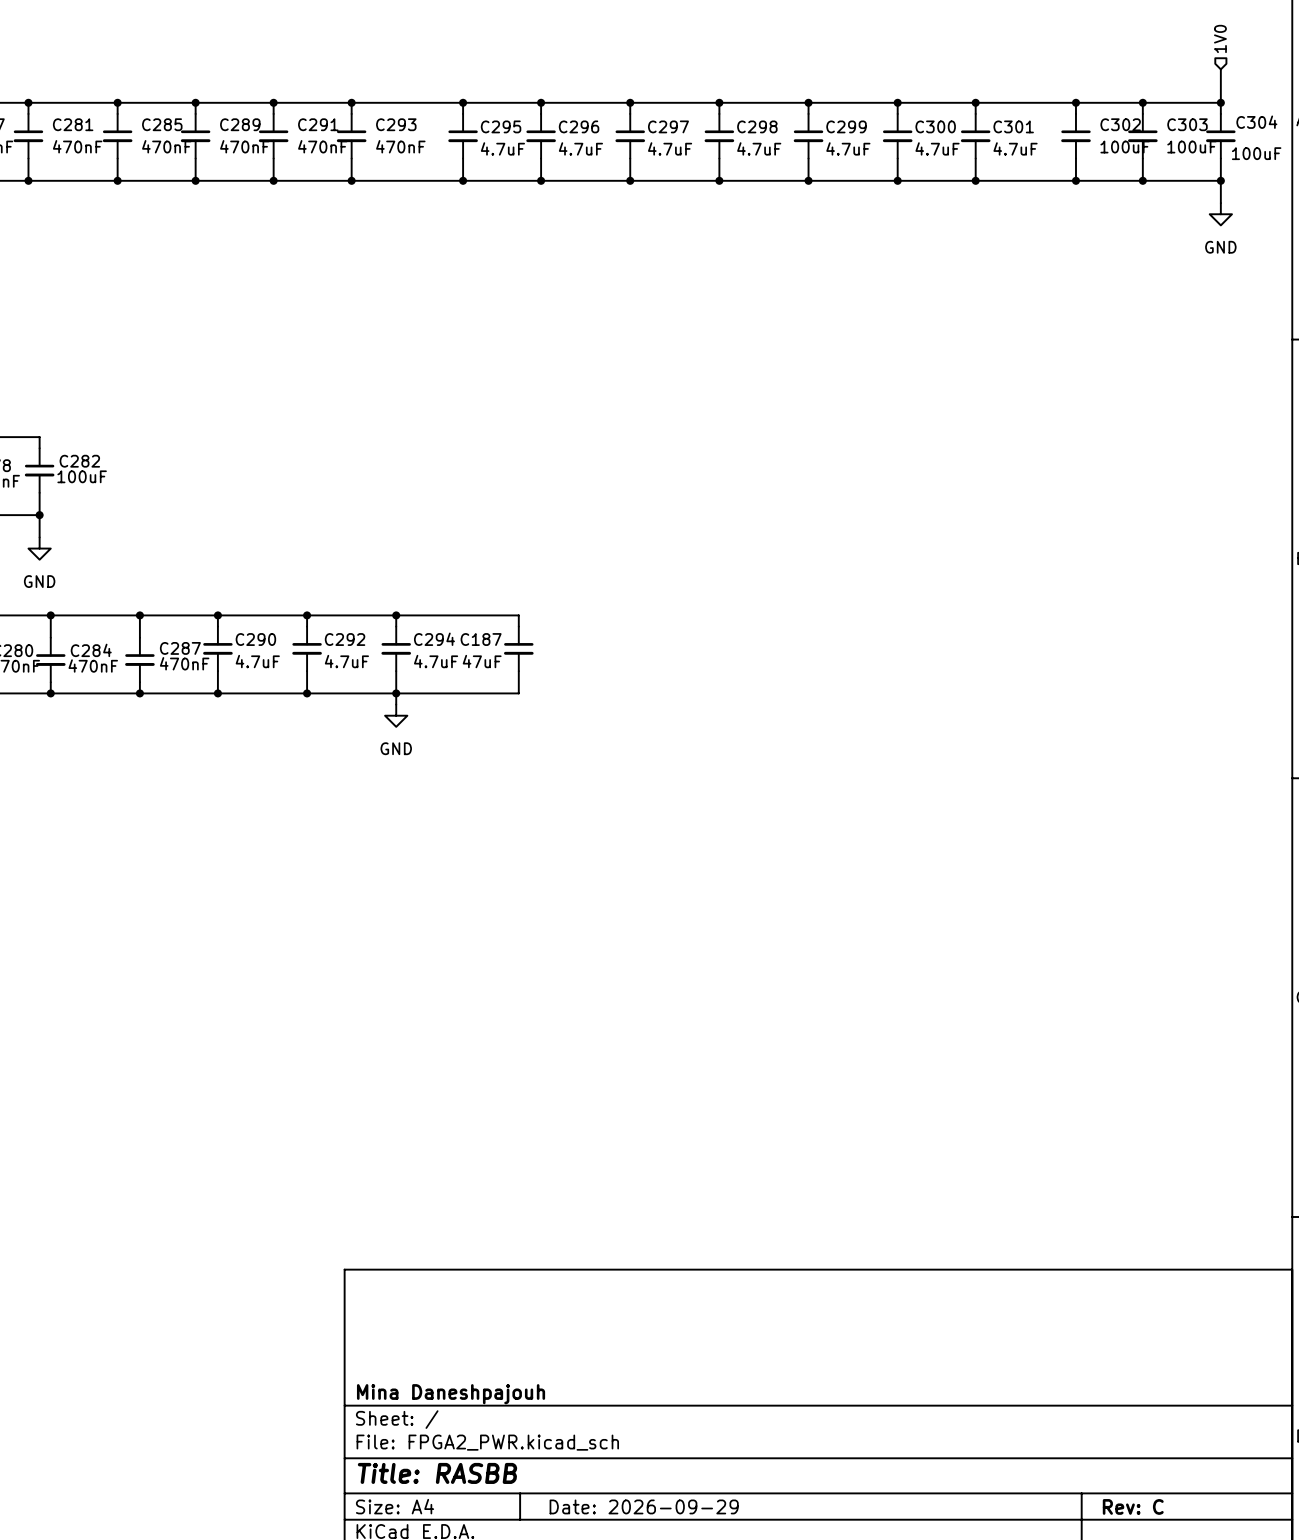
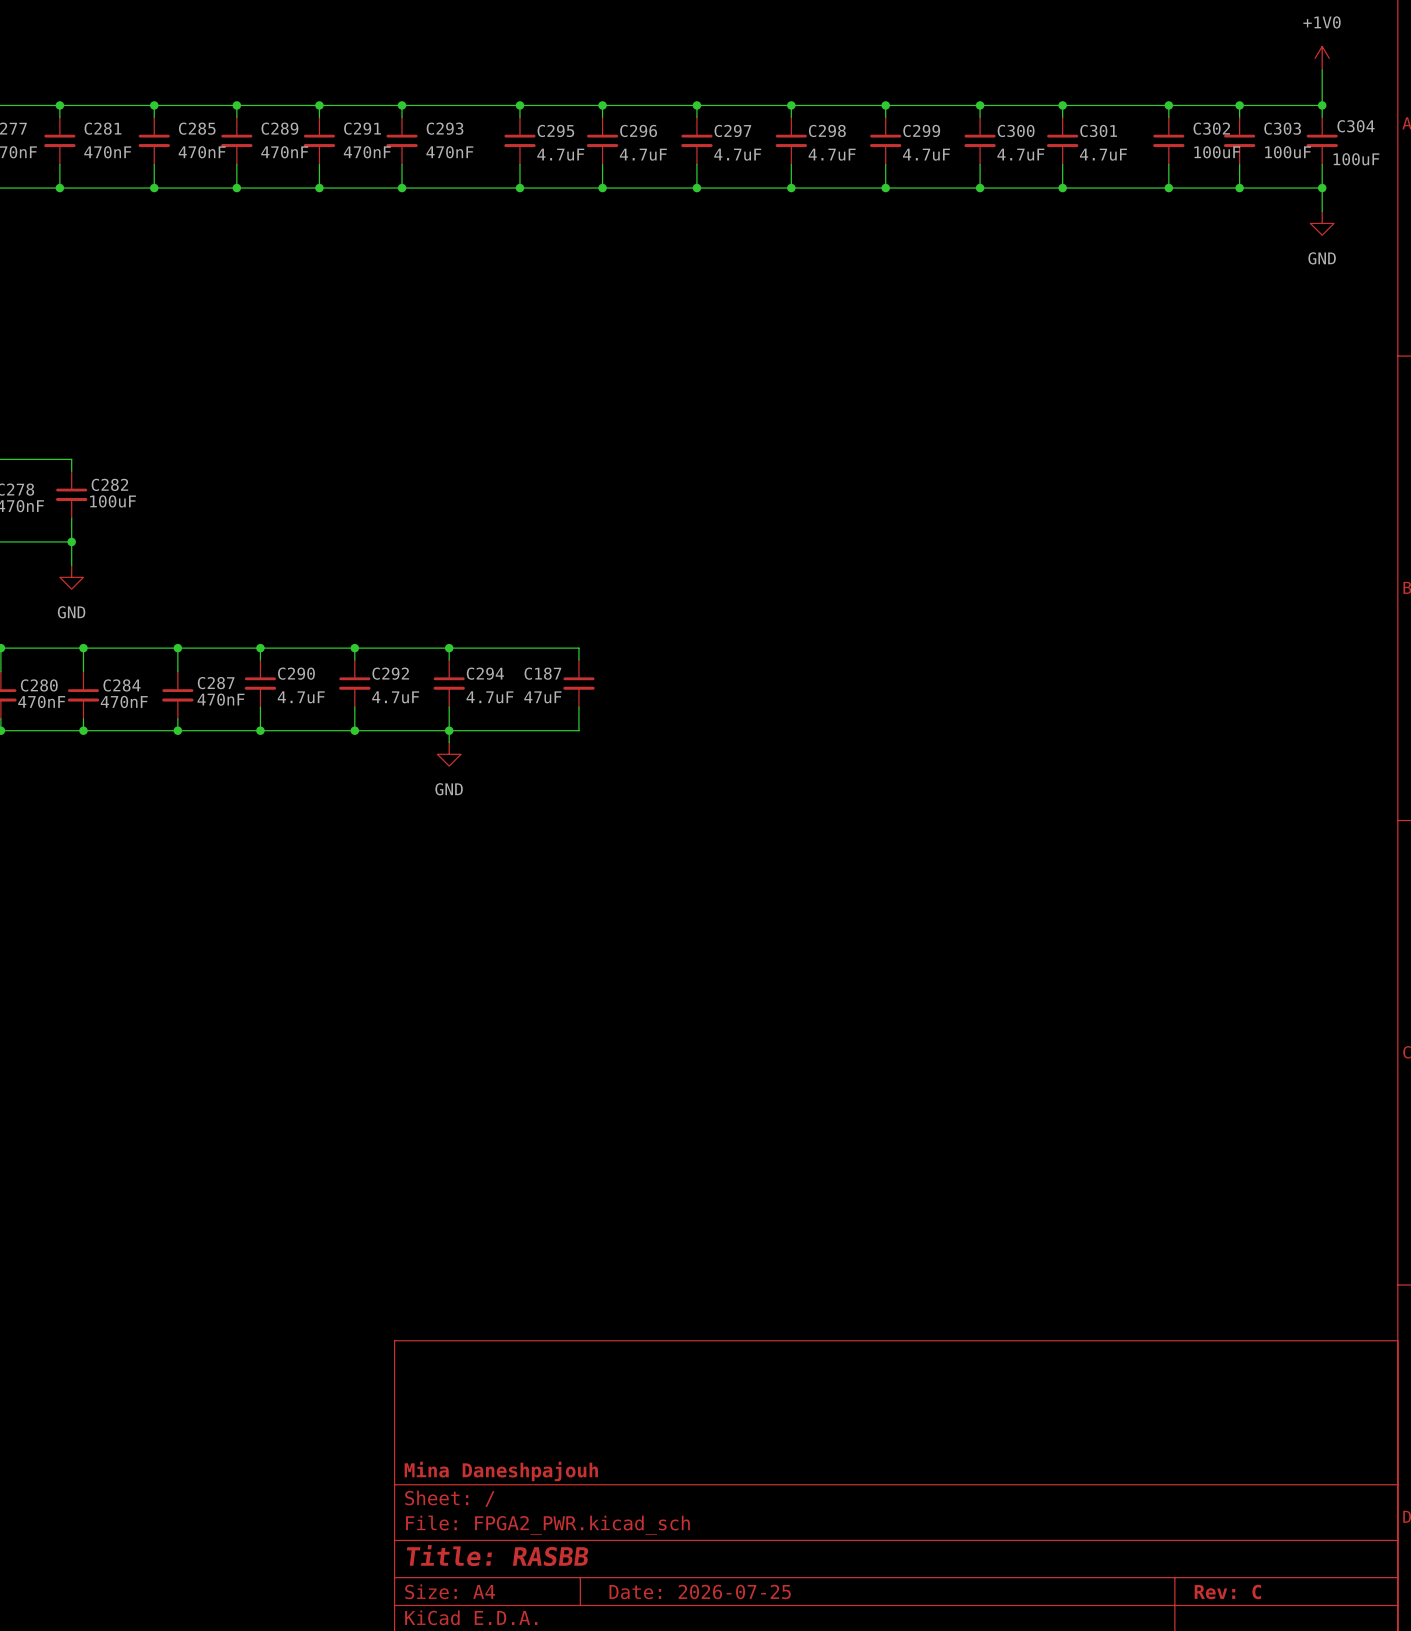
hierarchical label: 1V0 (1220, 38) -> none
power symbol: none -> +1V0 (1322, 58)
title block: Date: 2026-09-29 (644, 1506) -> Date: 2026-07-25 (700, 1591)

